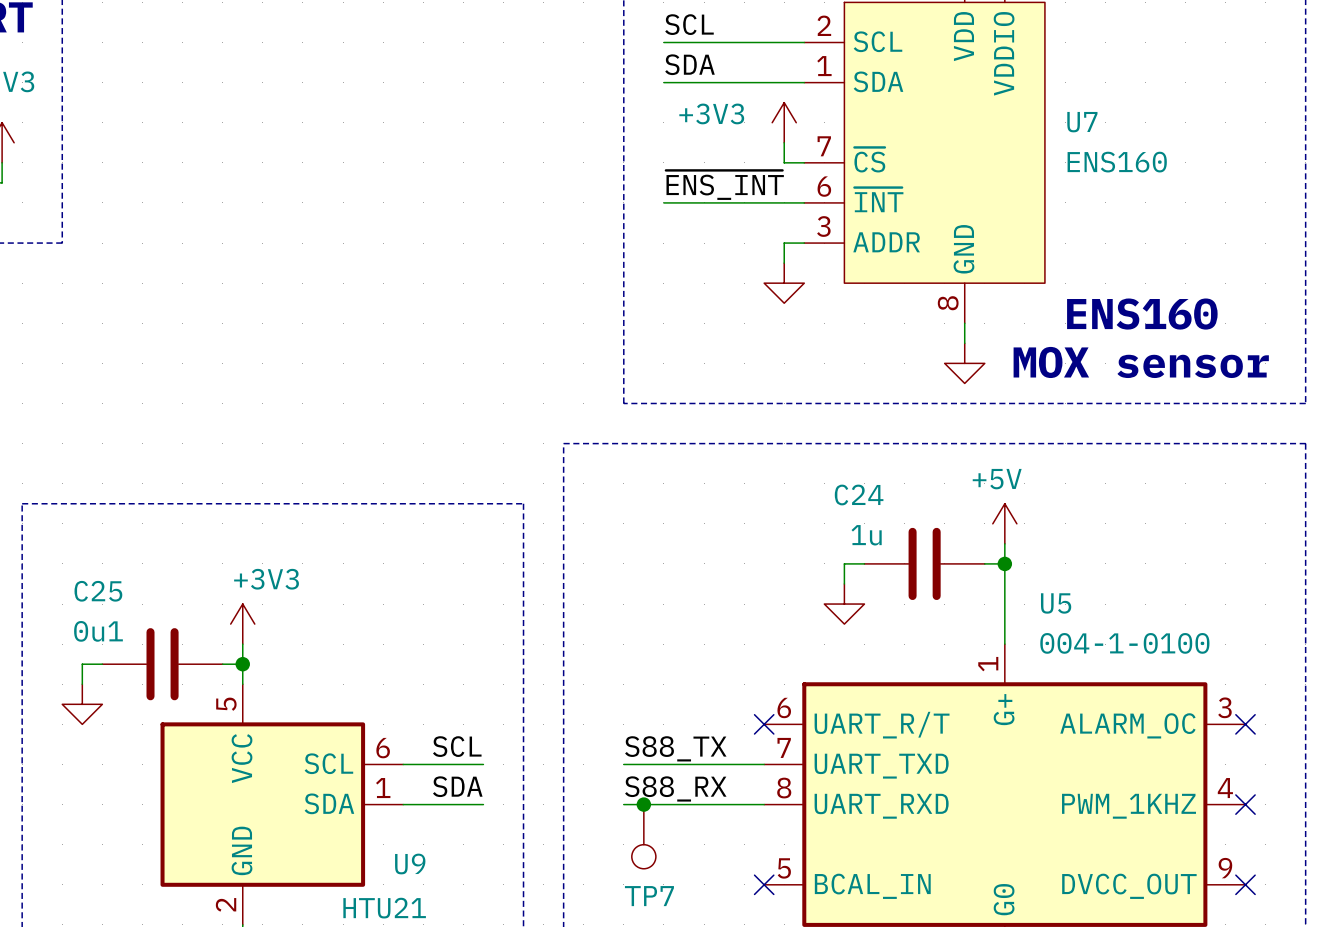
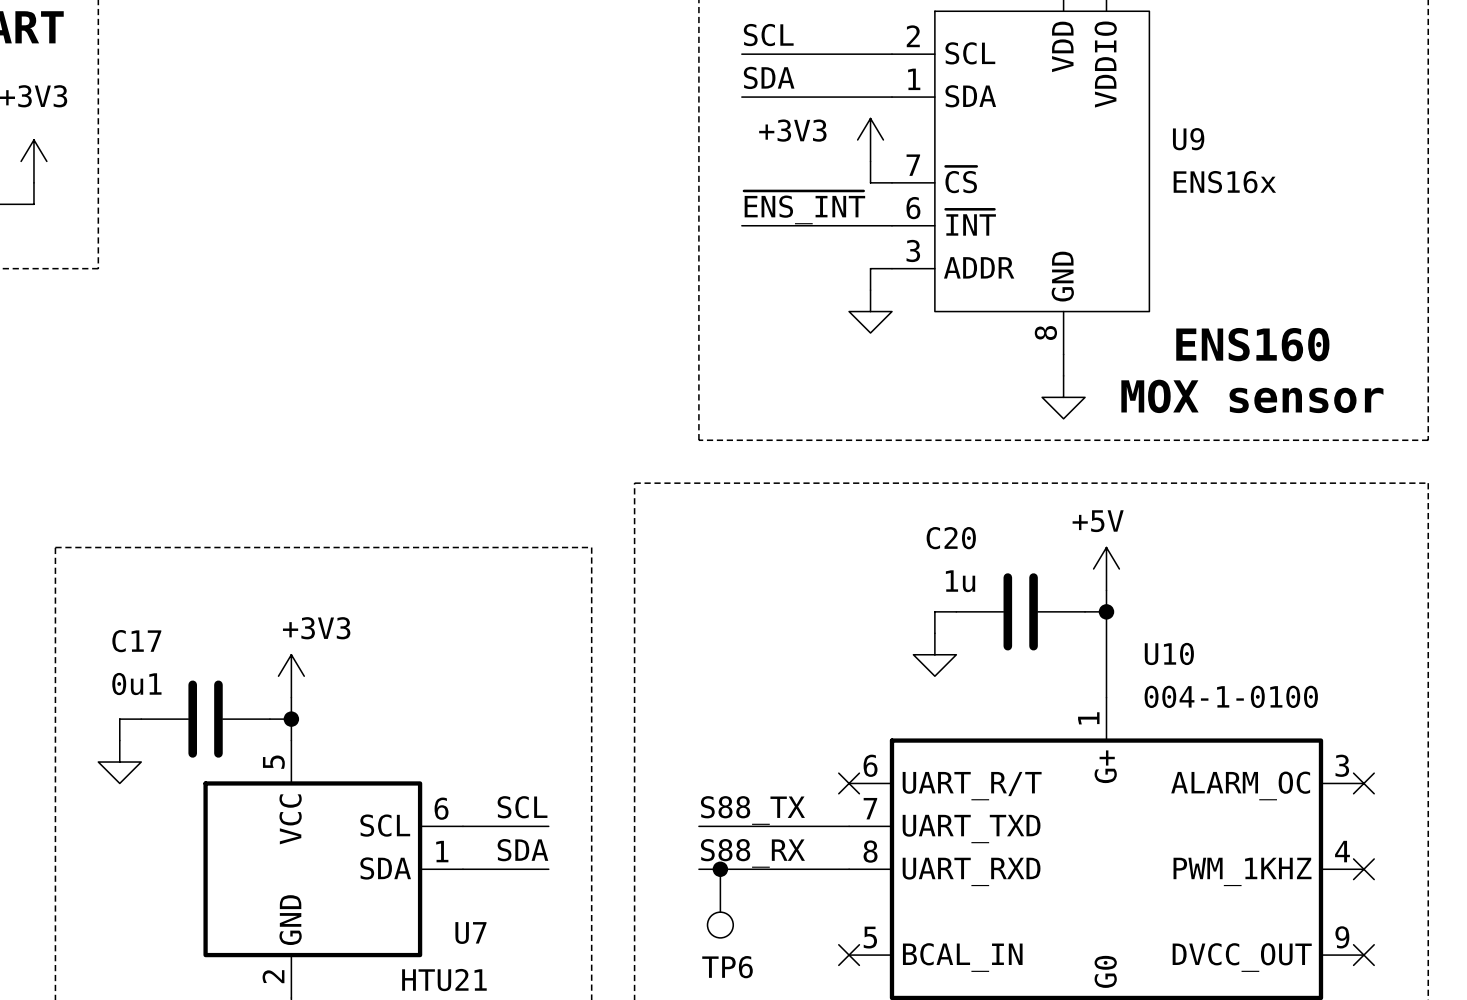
U7 name: U7 (1082, 122) -> U9 (1188, 139)
U7 value: ENS160 (1117, 162) -> ENS16x (1224, 182)
C24 name: C24 (859, 494) -> C20 (951, 538)
C25 name: C25 (98, 591) -> C17 (136, 641)
U5 name: U5 (1056, 603) -> U10 (1169, 653)
U9 name: U9 (410, 864) -> U7 (470, 933)
TP7 name: TP7 (649, 896) -> TP6 (727, 967)

